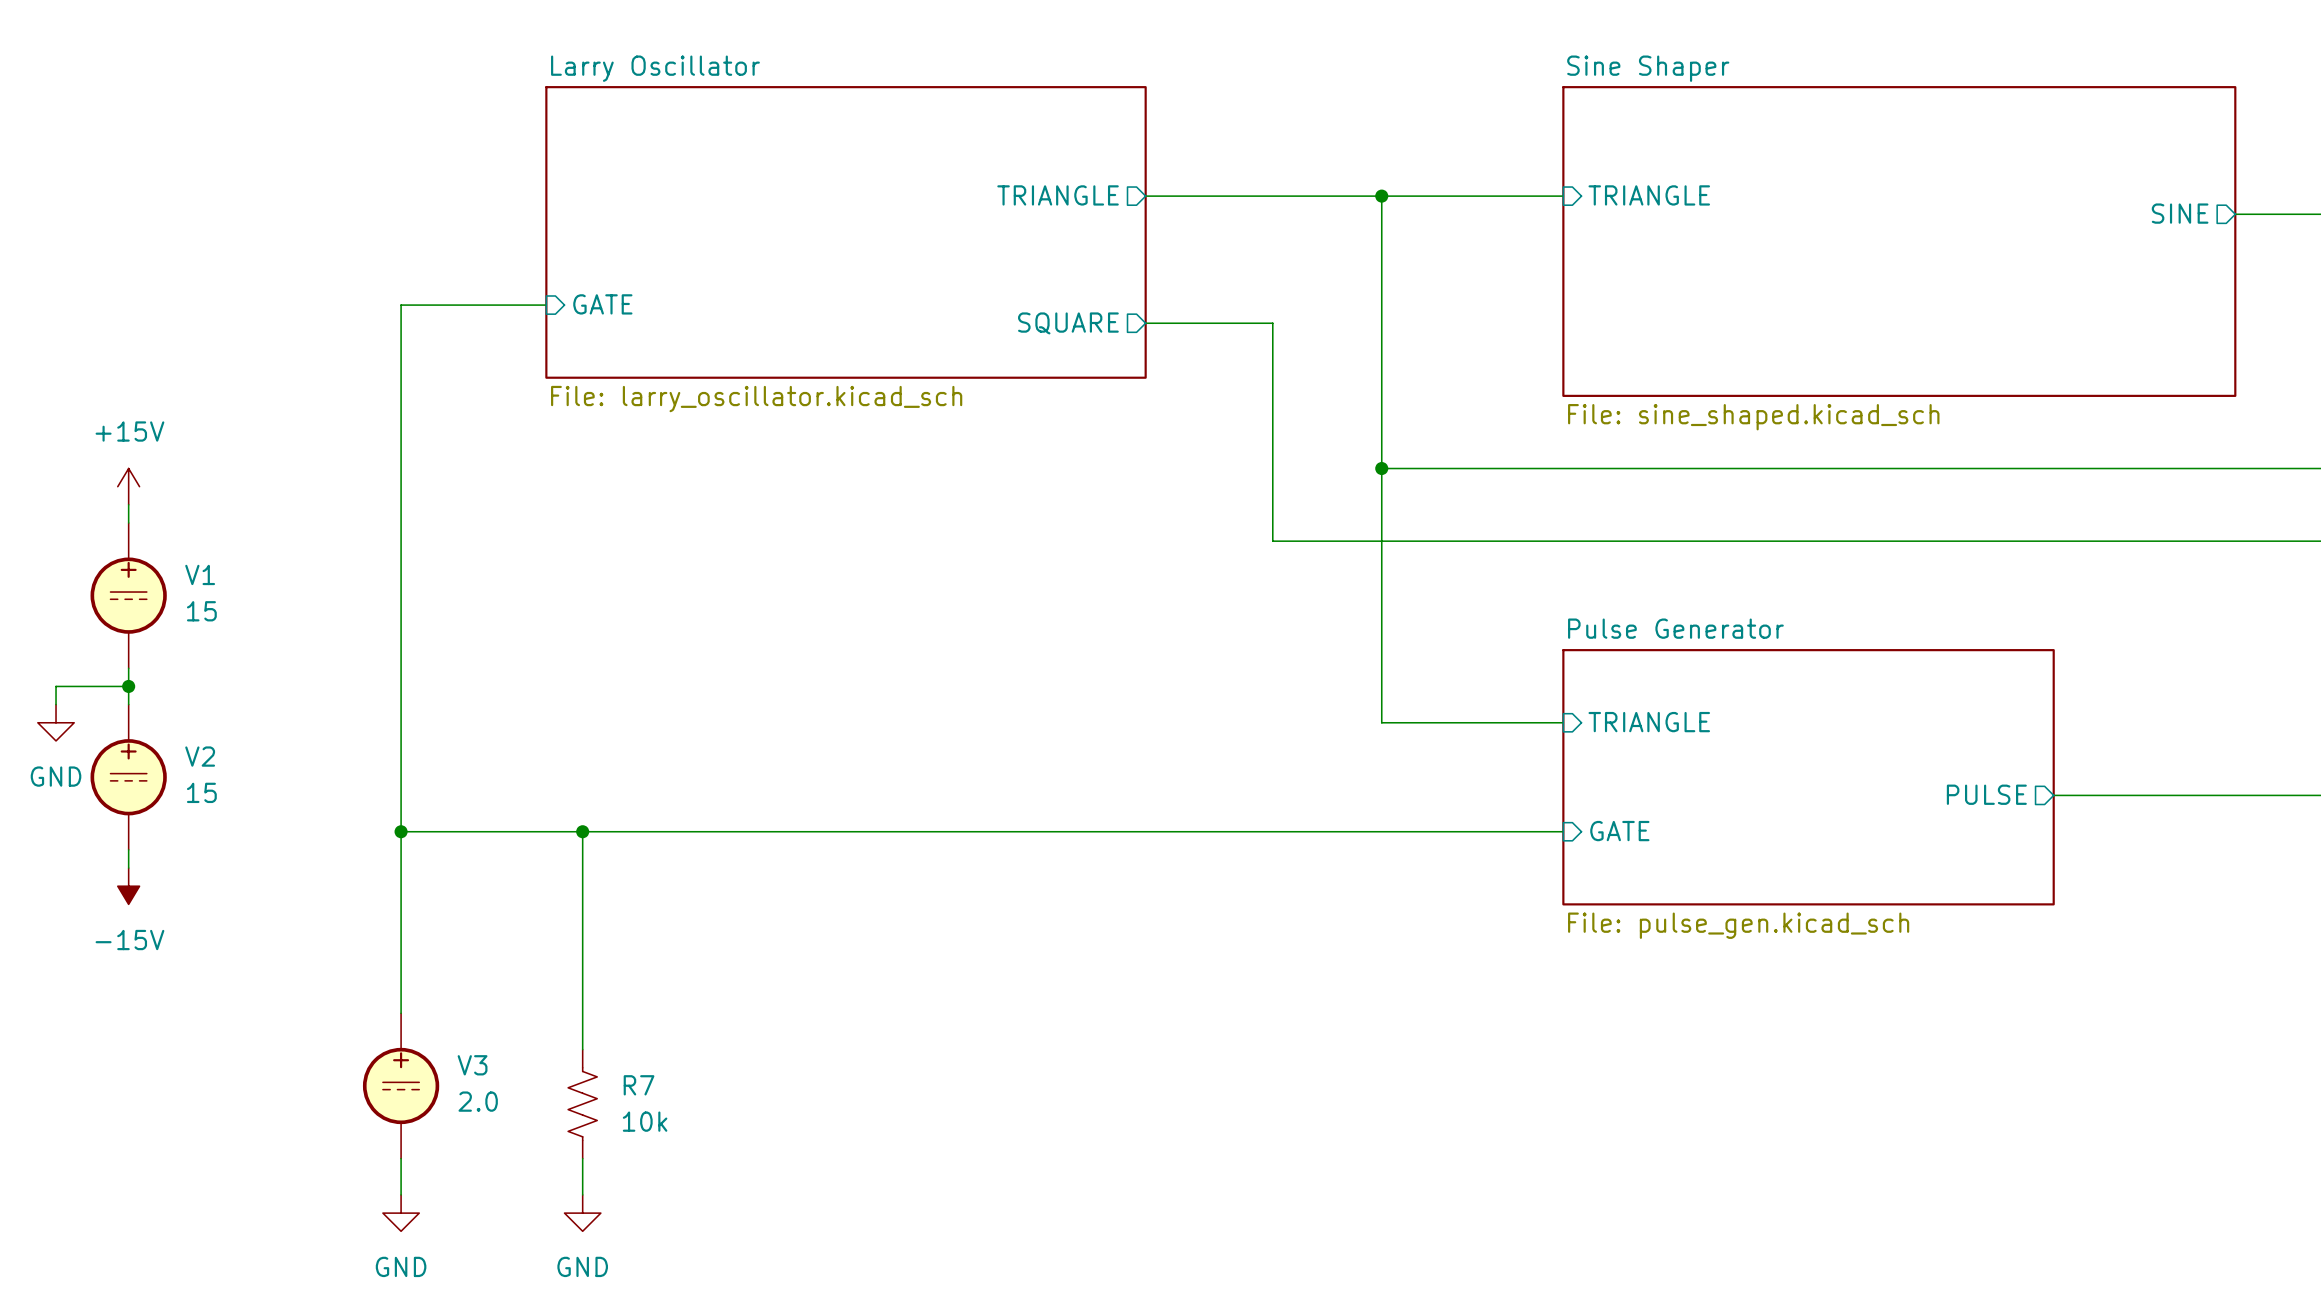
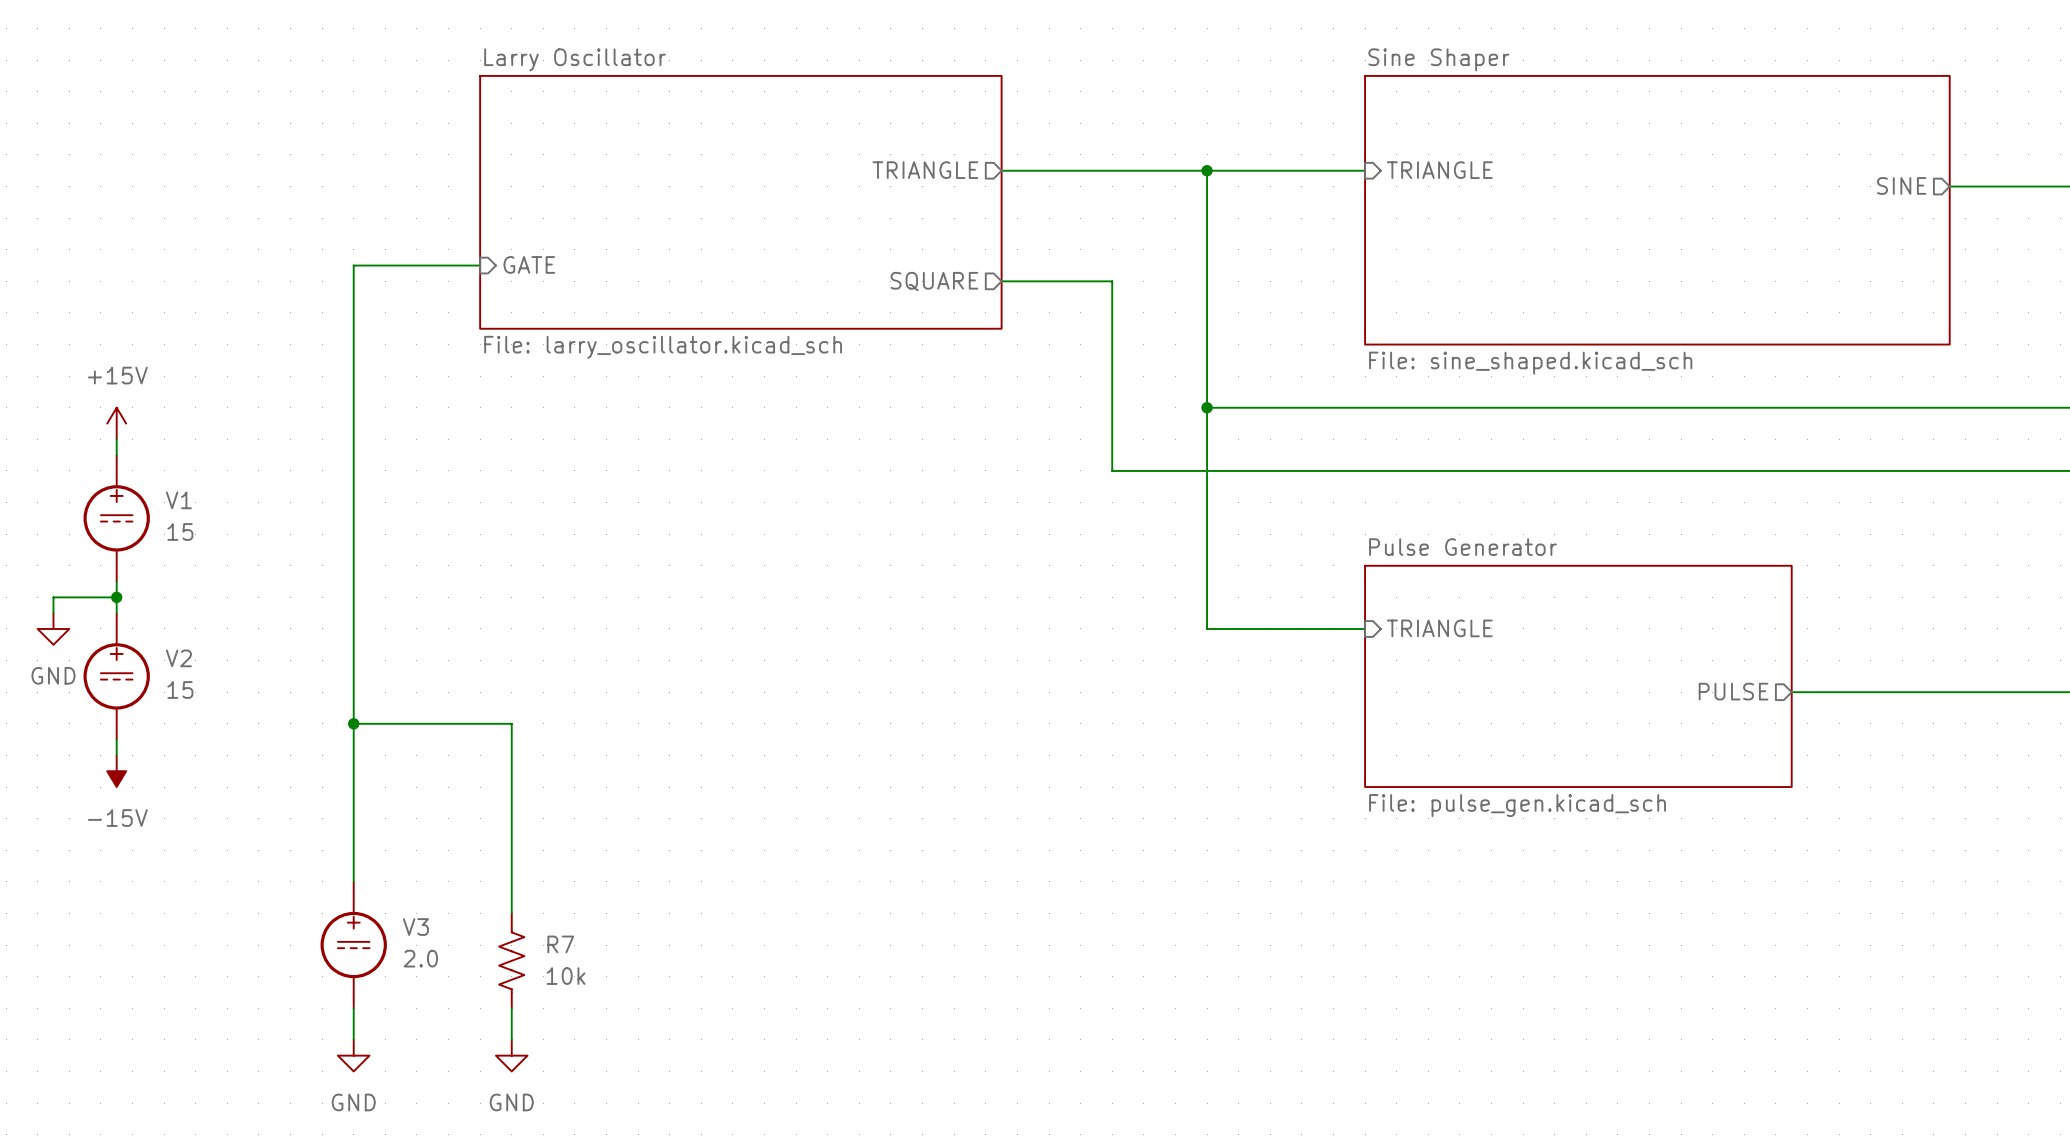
wire: (582, 831) (1563, 831) -> none
junction: (582, 831) -> none
sheet pin: GATE (1619, 831) -> none

